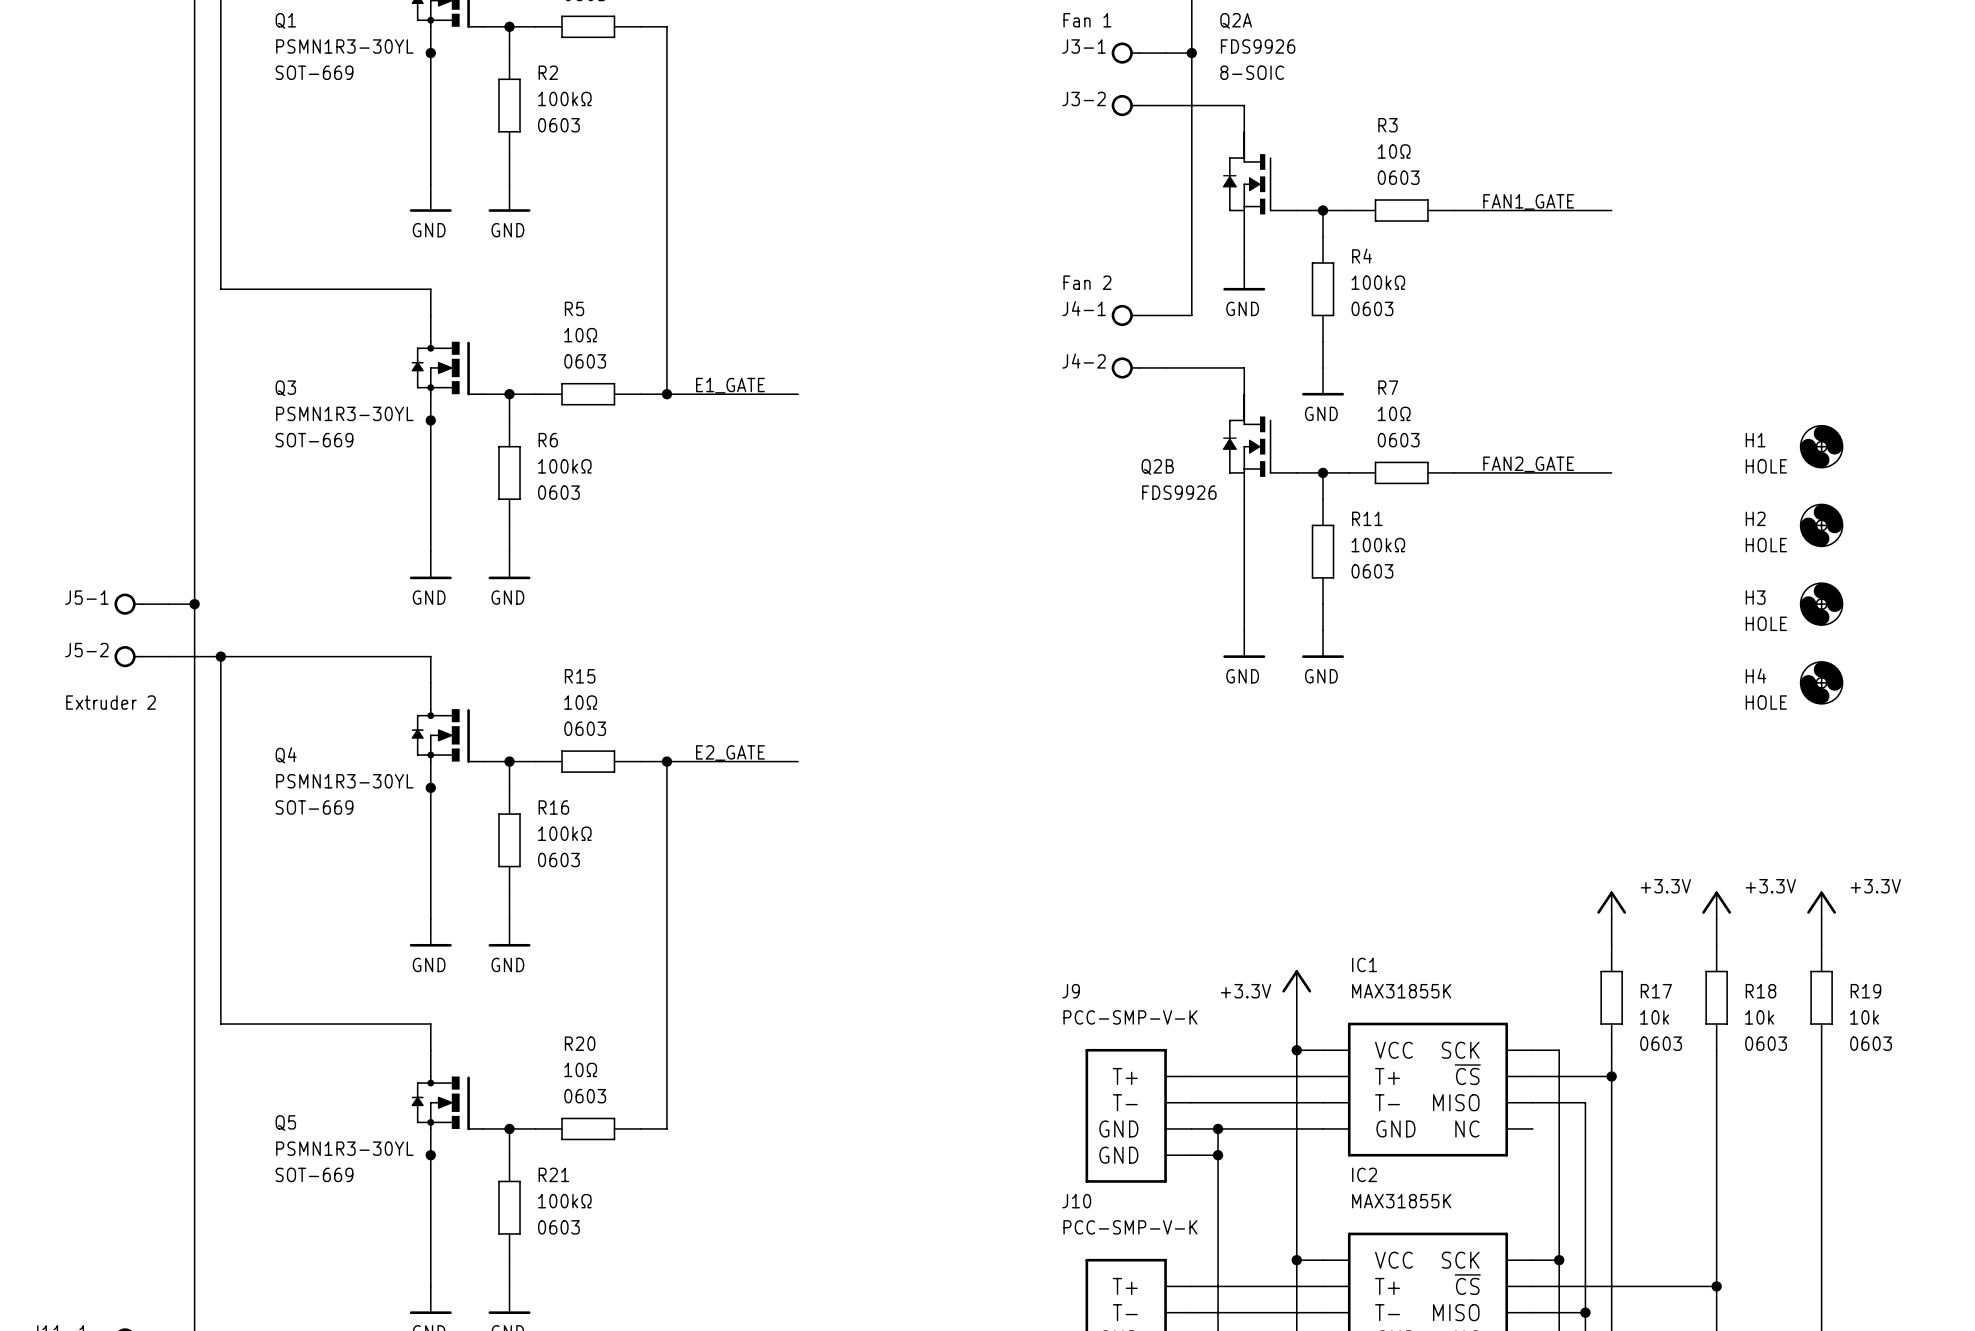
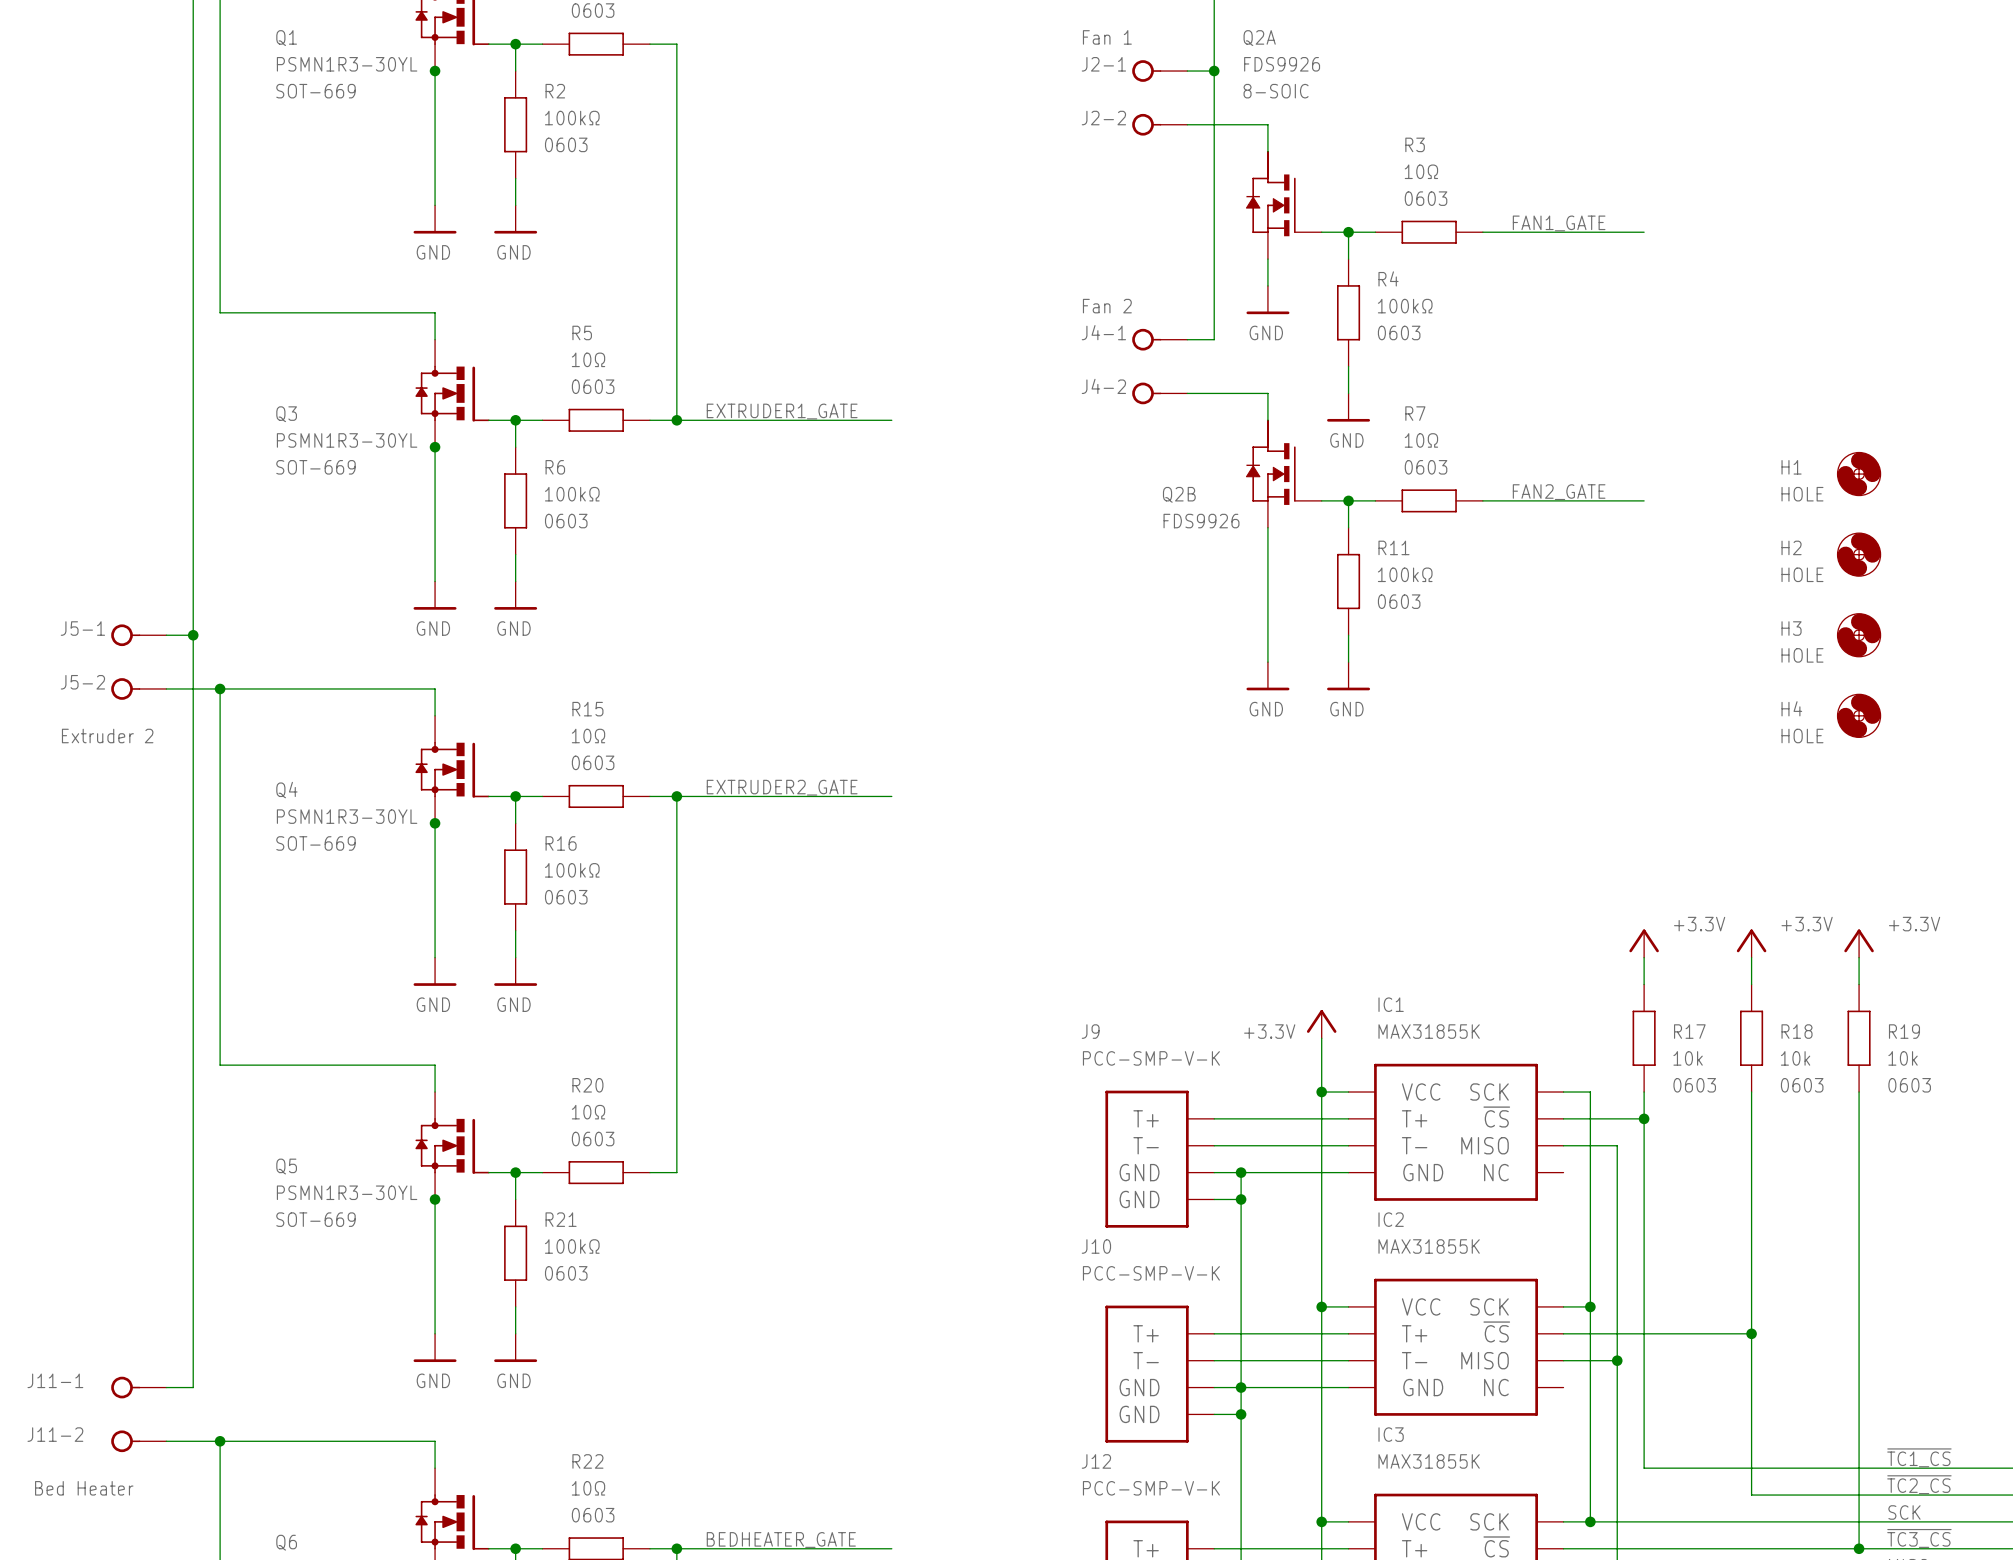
J3-1 name: J3-1 (1084, 46) -> J2-1 (1103, 64)
J3-2 name: J3-2 (1084, 98) -> J2-2 (1103, 118)
label: E1_GATE (730, 385) -> EXTRUDER1_GATE (782, 411)
wire: none -> (811, 420) (891, 420)
label: E2_GATE (730, 753) -> EXTRUDER2_GATE (782, 787)
wire: none -> (811, 796) (891, 796)

